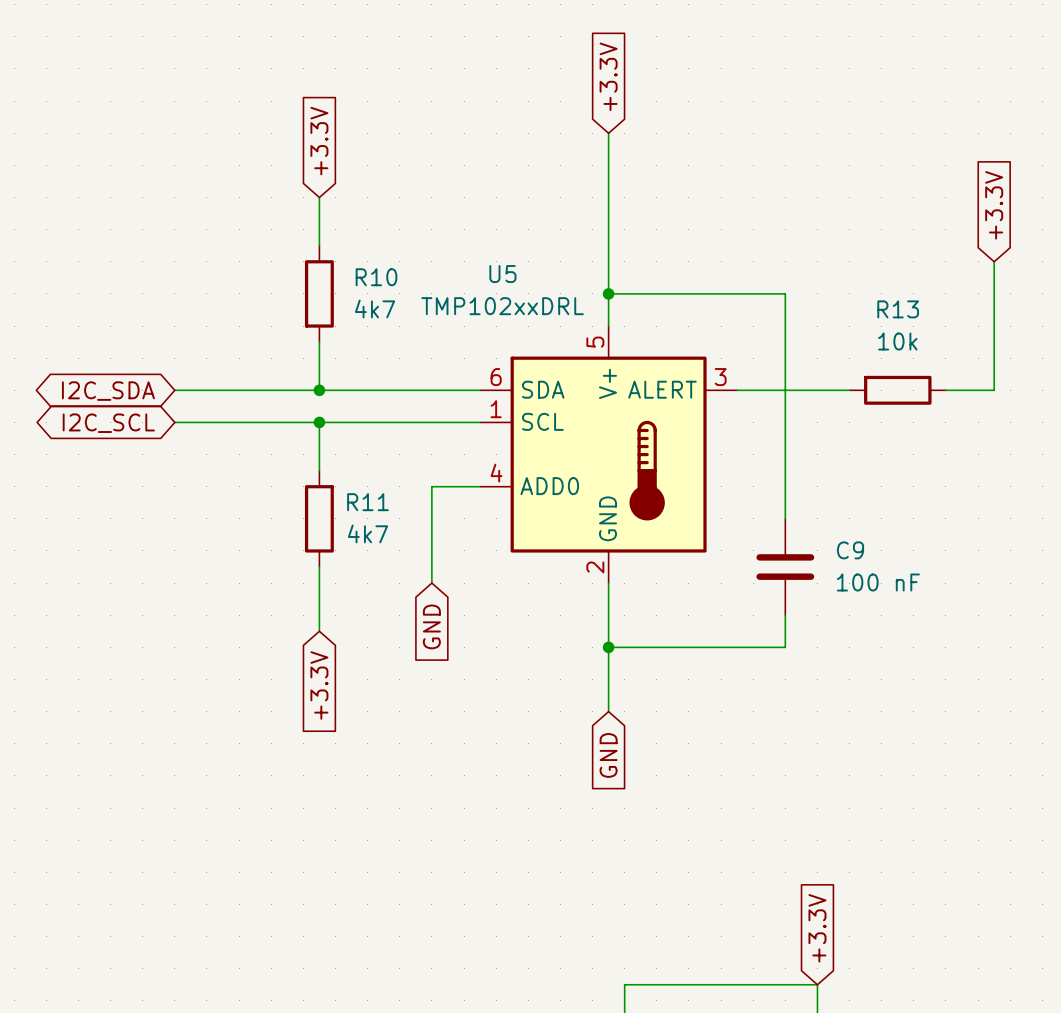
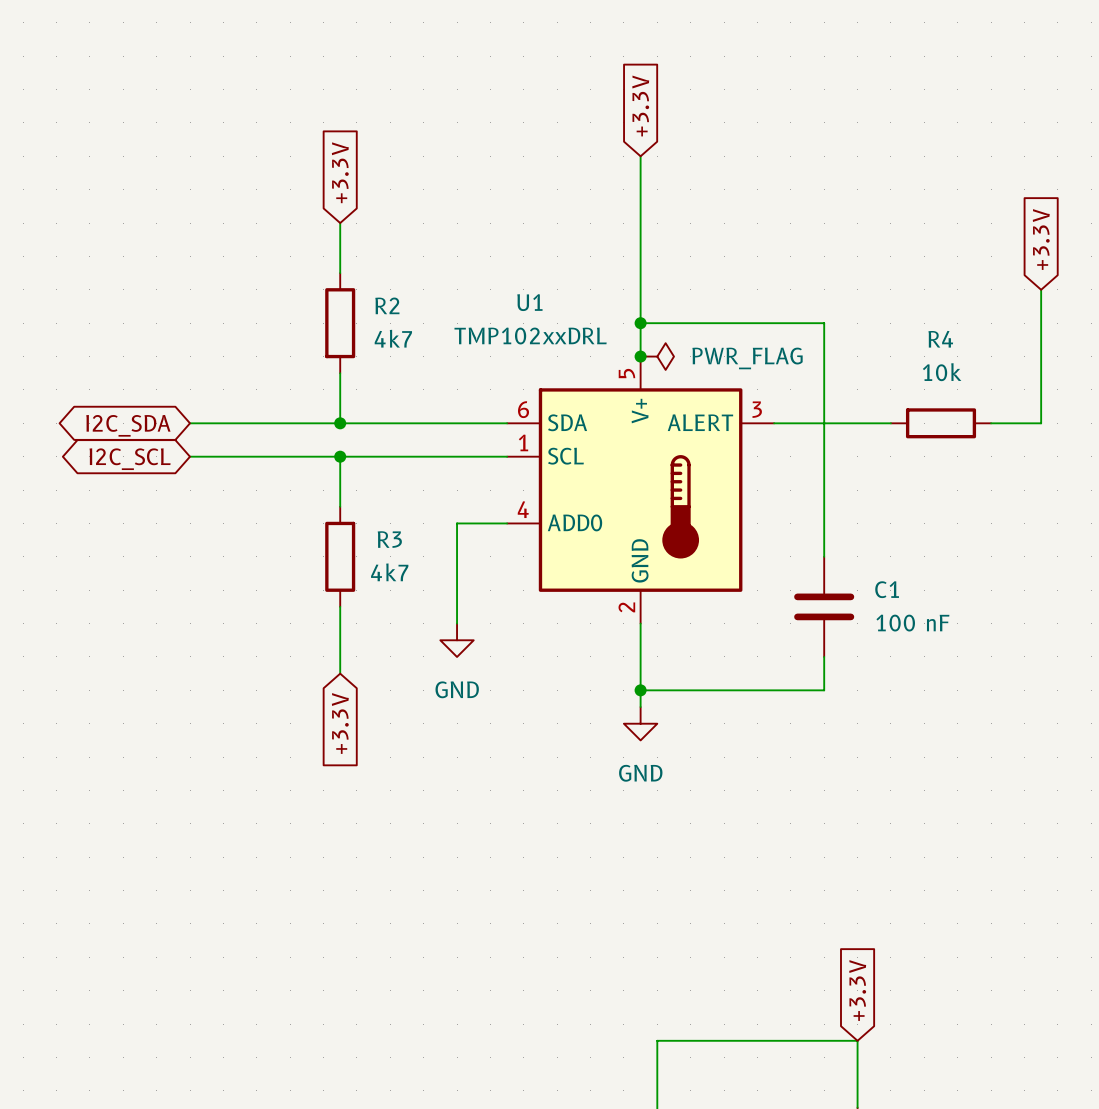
U5 name: U5 (502, 274) -> U1 (529, 302)
R10 name: R10 (376, 277) -> R2 (387, 305)
R13 name: R13 (898, 309) -> R4 (940, 339)
junction: none -> (640, 356)
power symbol: none -> PWR_FLAG (657, 356)
R11 name: R11 (367, 502) -> R3 (389, 539)
C9 name: C9 (850, 550) -> C1 (887, 589)
power symbol: none -> GND (457, 640)
global label: GND (431, 626) -> none
wire: (608, 663) (608, 711) -> none
power symbol: none -> GND (640, 723)
global label: GND (608, 755) -> none

